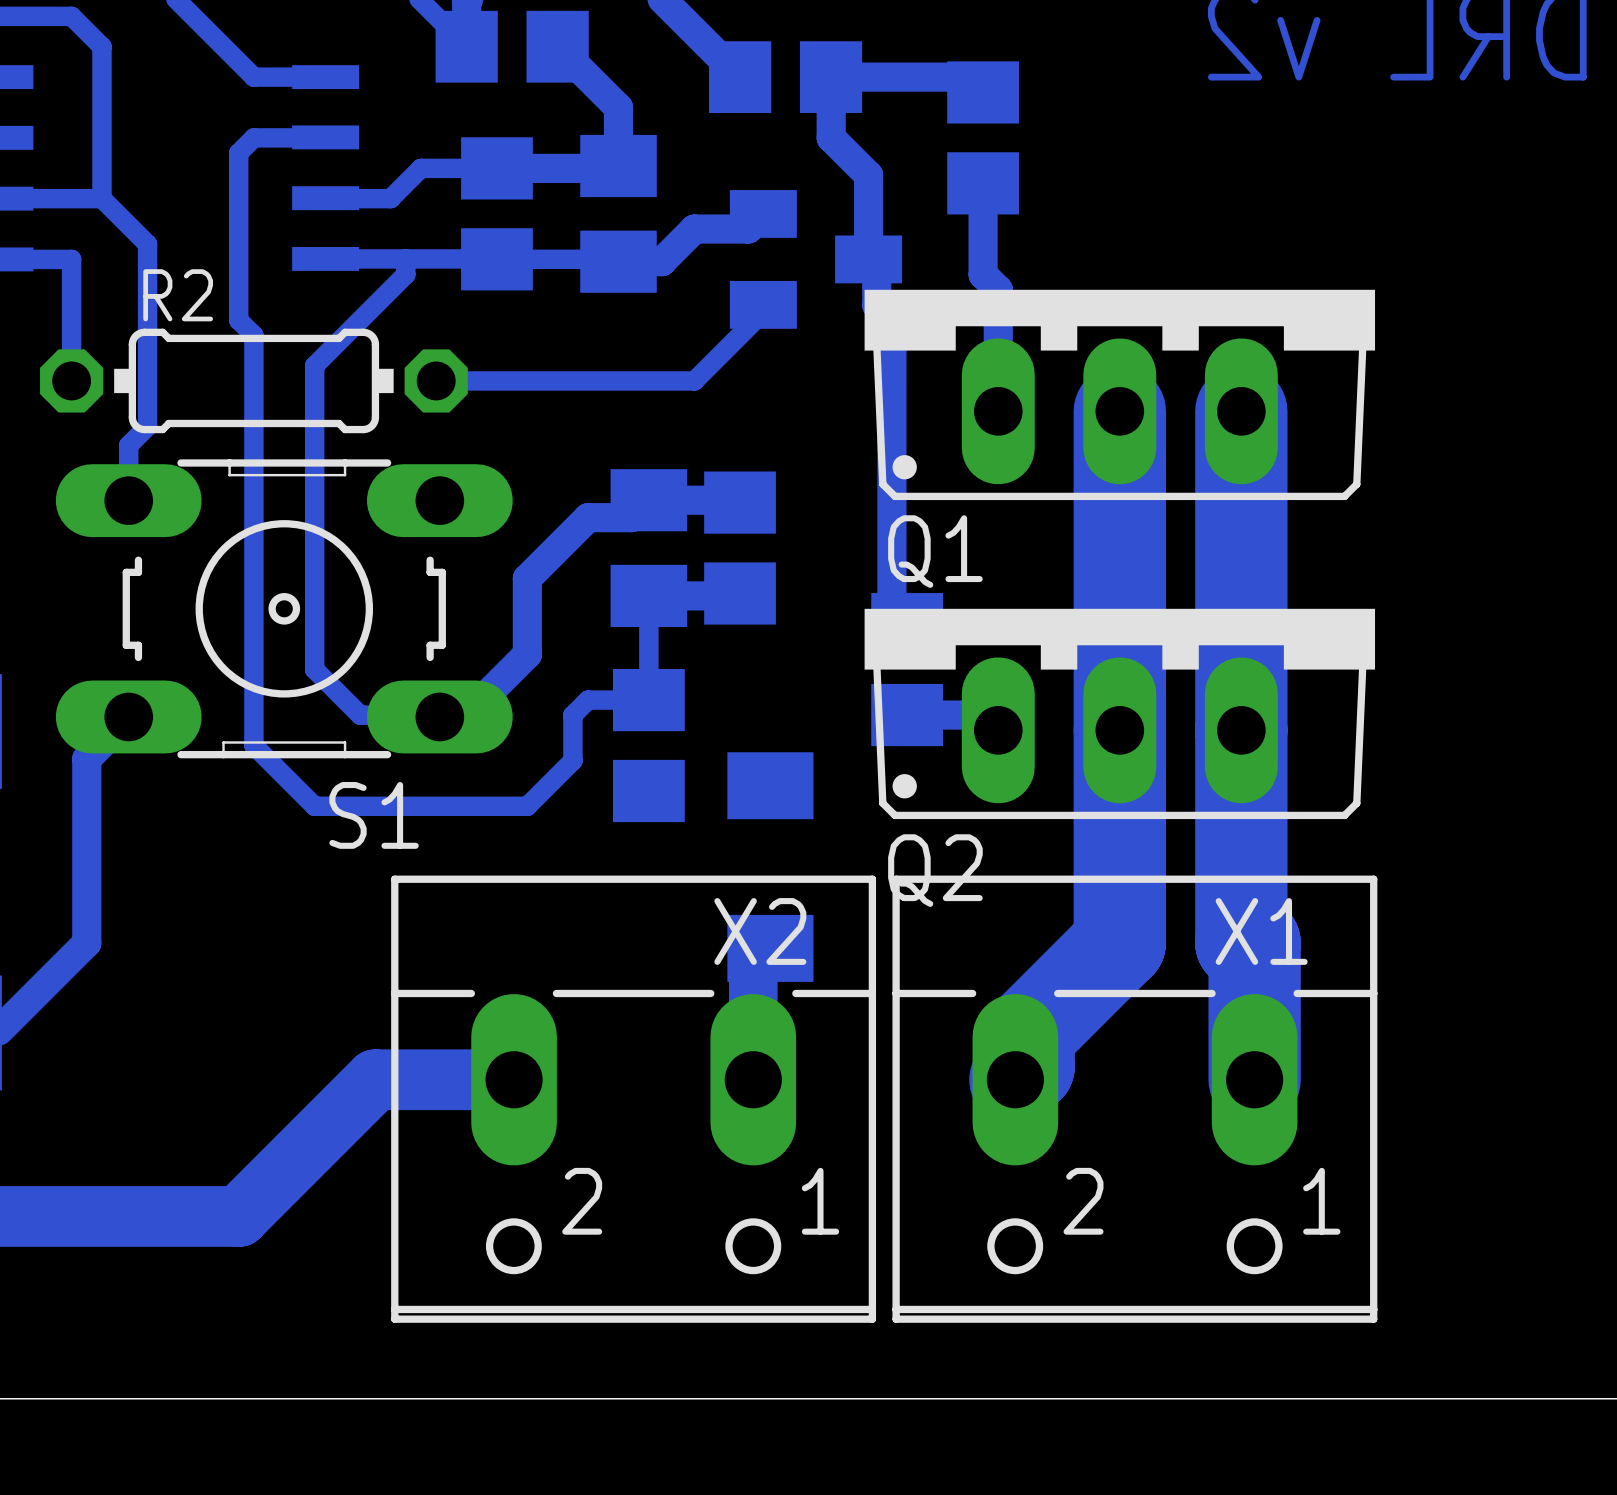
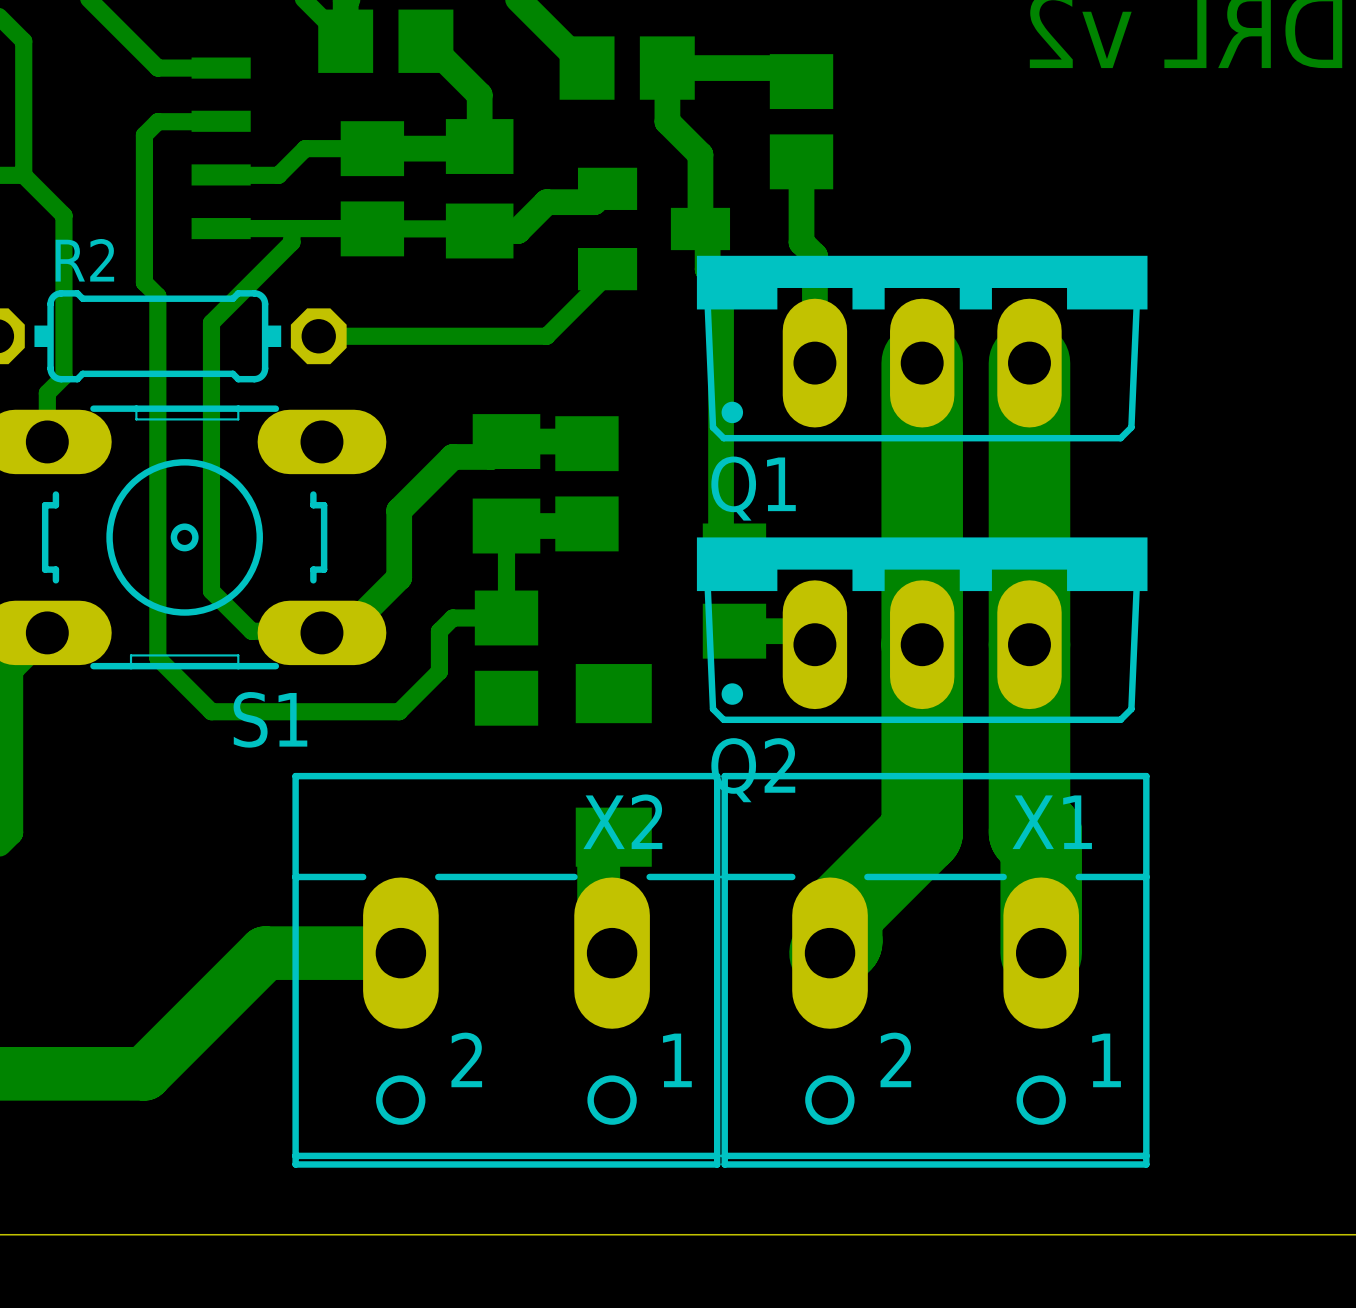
X2 position: (633, 1099) -> (506, 970)

